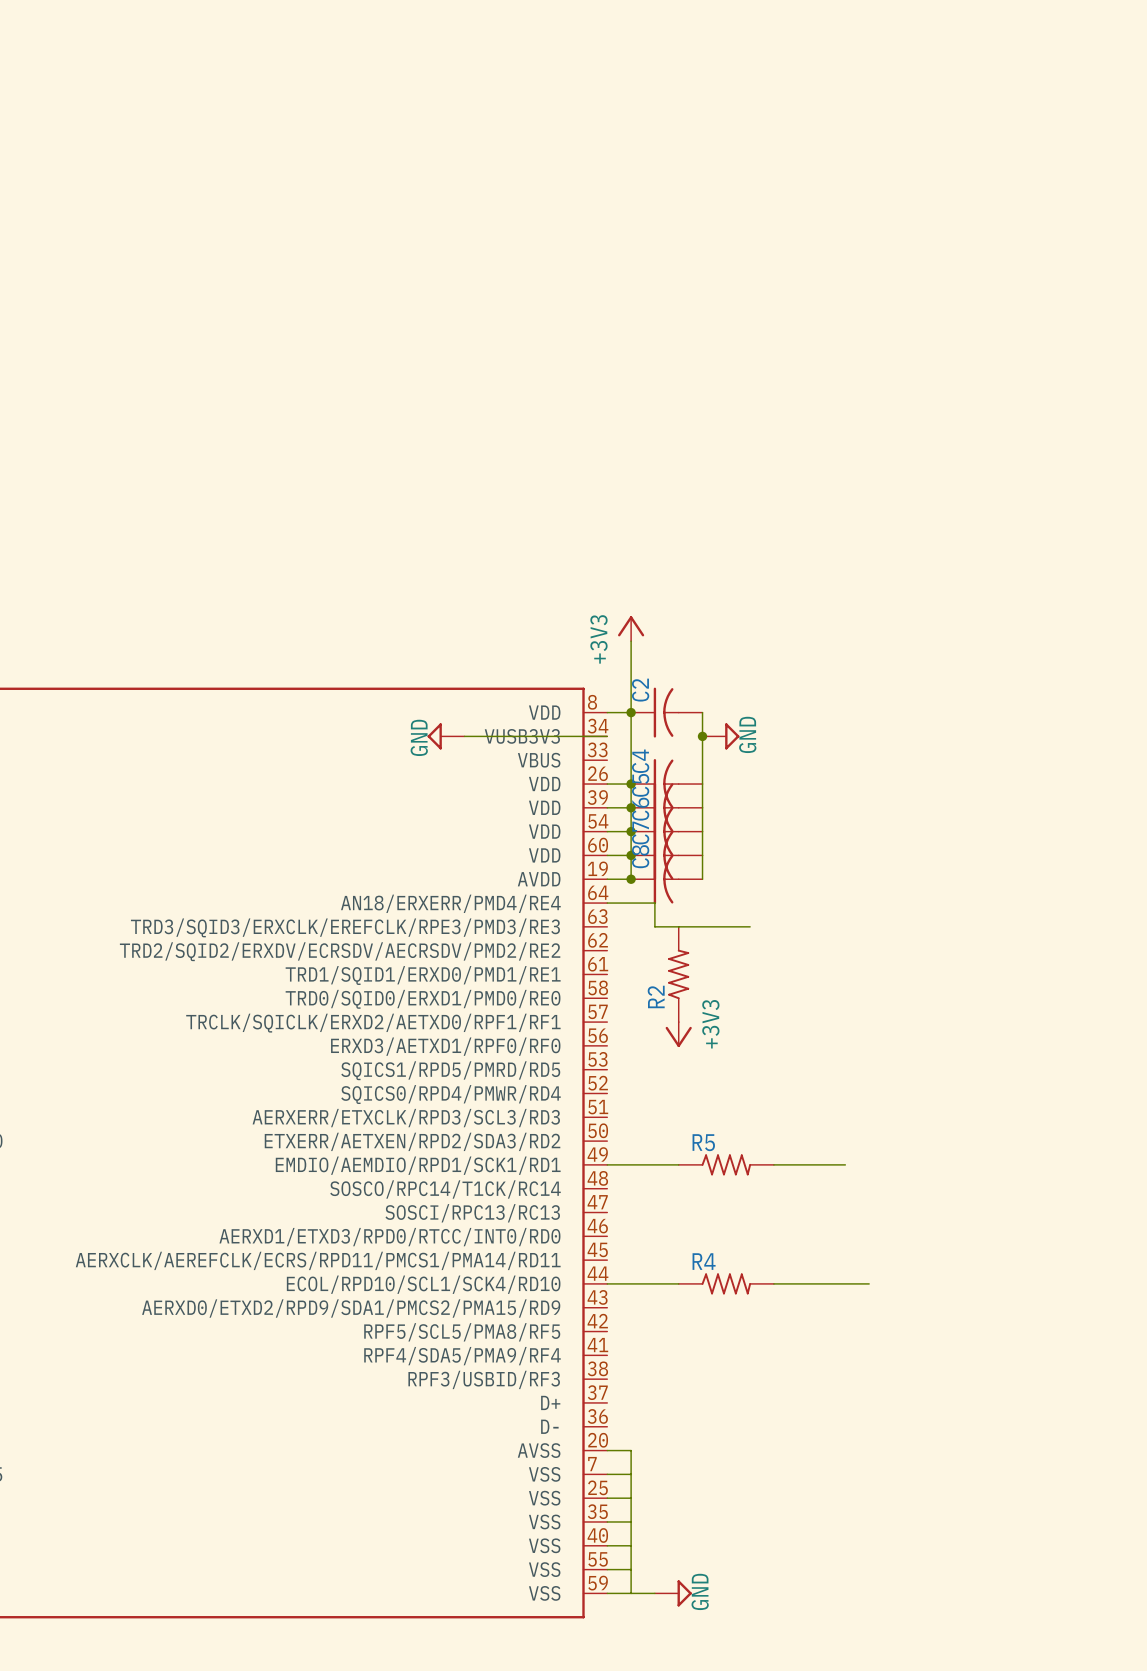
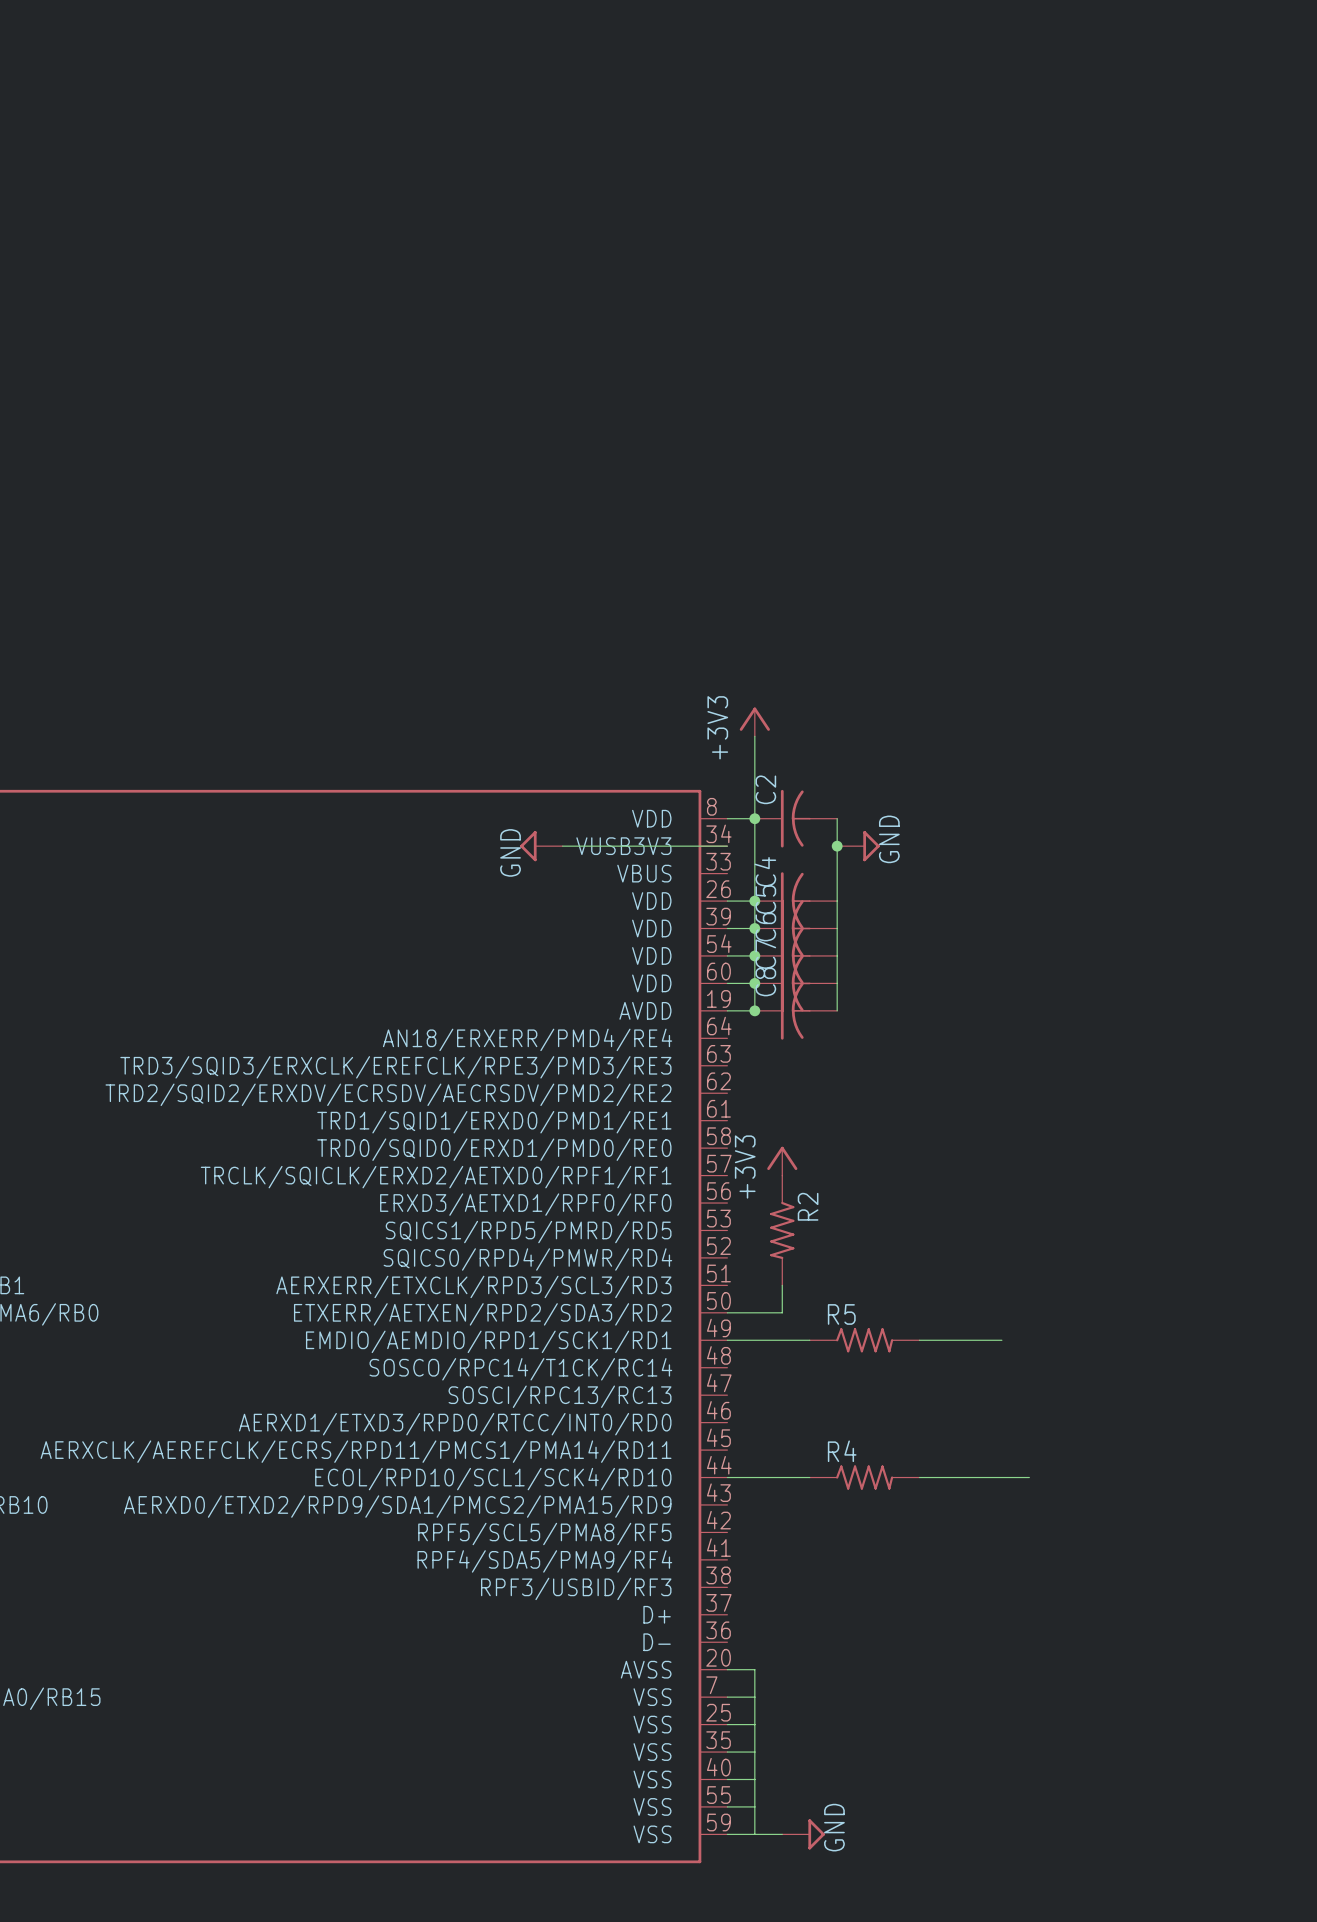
wire: (607, 903) (654, 903) (654, 926) (750, 926) -> none
R2 rotation: 0° (678, 974) -> 180° (782, 1230)
R2 position: (678, 974) -> (782, 1230)
power symbol position: +3V3 (678, 1034) -> +3V3 (782, 1161)
power symbol rotation: 0° (678, 1036) -> 180° (782, 1158)
wire: none -> (782, 1285) (782, 1312) (727, 1312)

